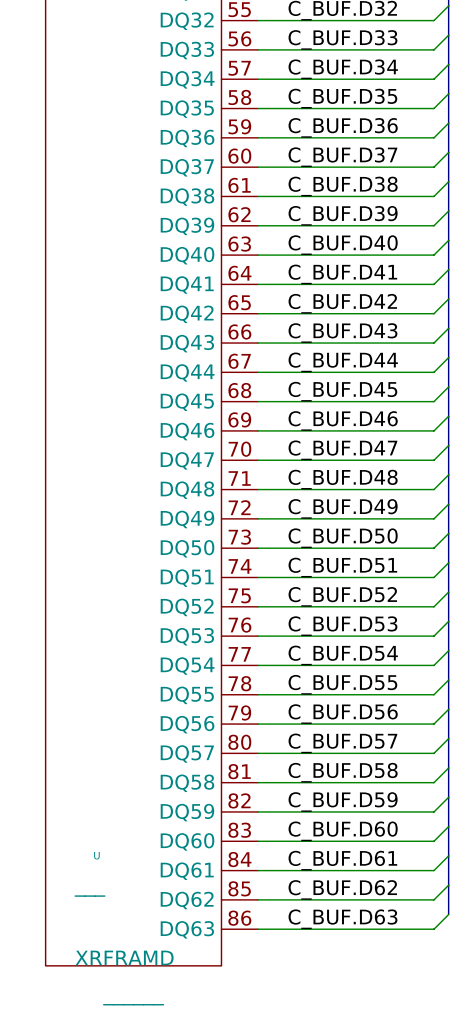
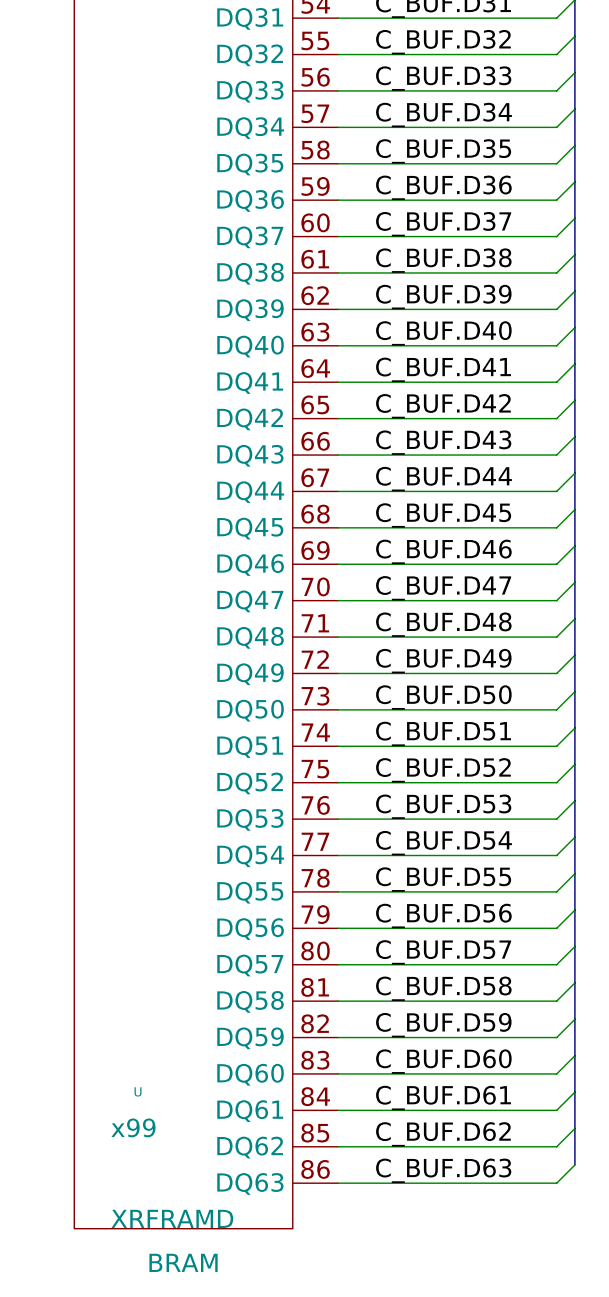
U text: ___ (90, 896) -> x99 (133, 1127)
U text: ______ (133, 1004) -> BRAM (183, 1262)

